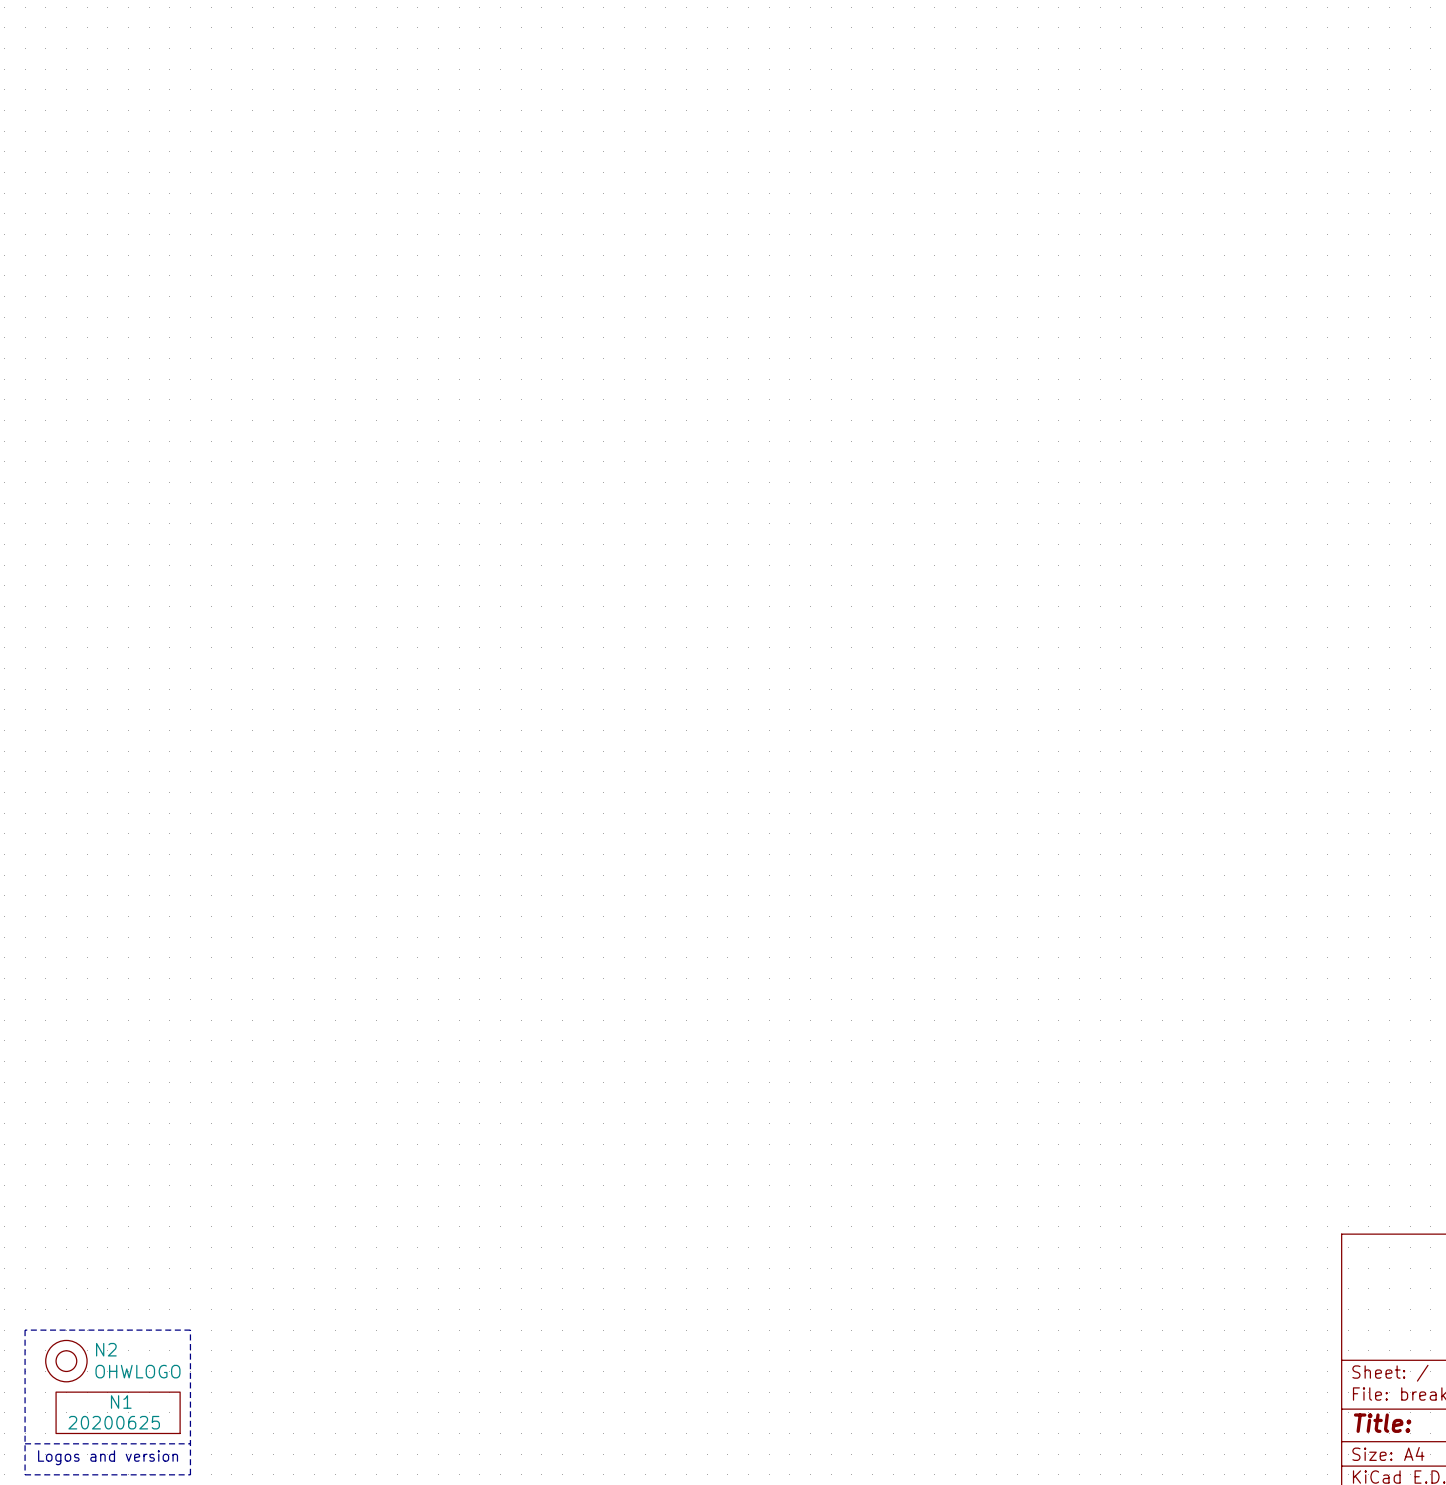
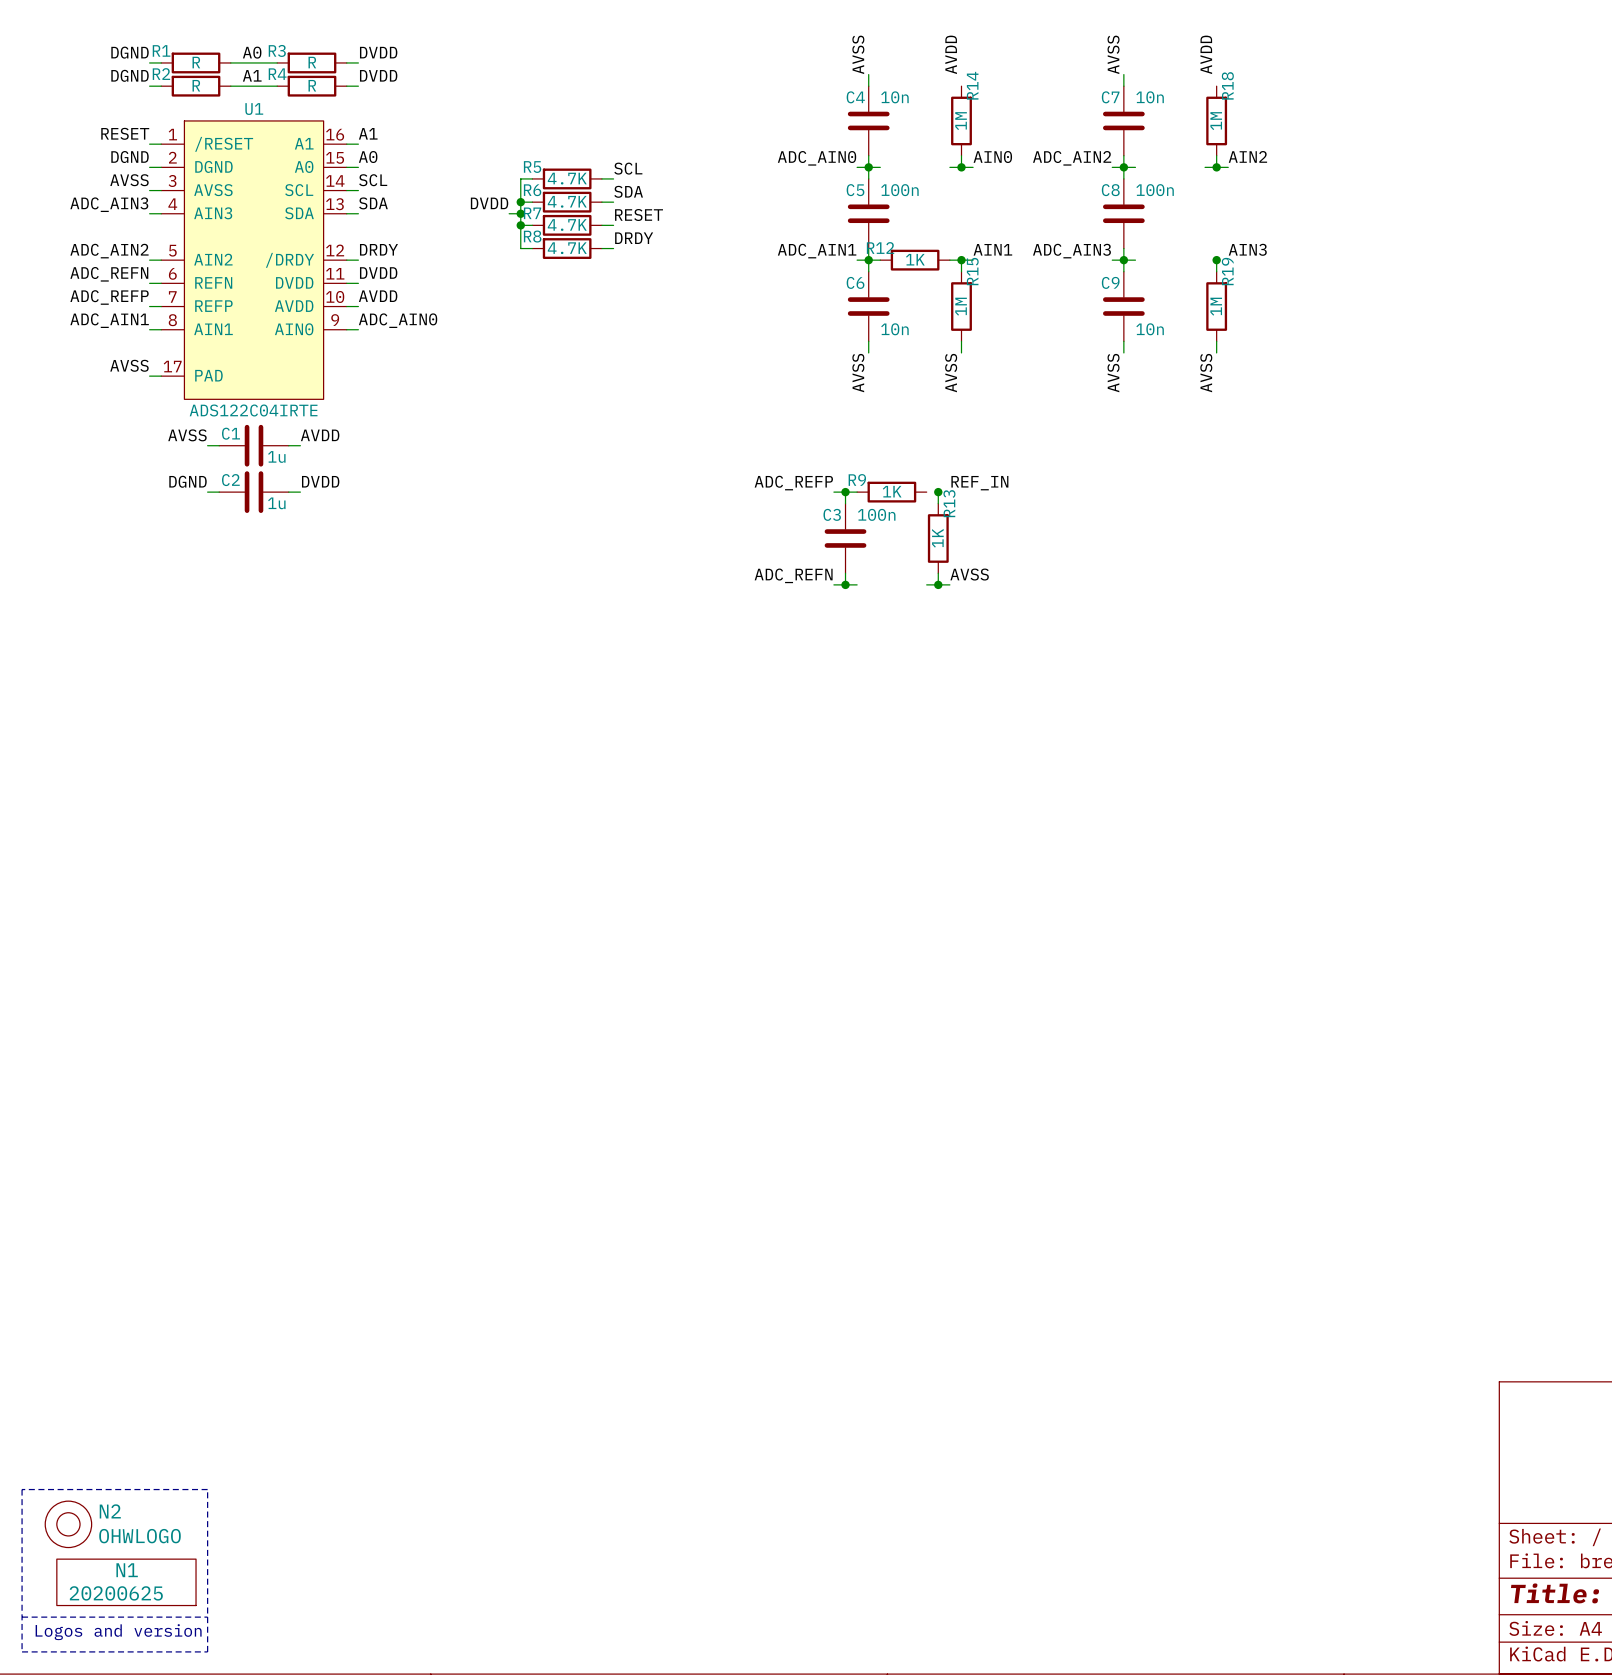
label: none -> DGND (130, 52)
label: none -> A0 (252, 52)
label: none -> DVDD (378, 52)
label: none -> AVDD (951, 54)
label: none -> AVDD (1206, 54)
label: none -> AVSS (858, 54)
label: none -> AVSS (1113, 54)
wire: none -> (149, 62) (161, 62)
R1: none -> R (196, 62)
wire: none -> (230, 62) (277, 62)
R3: none -> R (312, 62)
wire: none -> (346, 62) (358, 62)
wire: none -> (868, 74) (868, 86)
wire: none -> (1123, 74) (1123, 86)
label: none -> DGND (130, 75)
label: none -> A1 (252, 75)
label: none -> DVDD (378, 75)
wire: none -> (149, 86) (161, 86)
R2: none -> R (196, 86)
wire: none -> (230, 86) (277, 86)
R4: none -> R (312, 86)
wire: none -> (346, 86) (358, 86)
C4: none -> 10n (868, 120)
R14: none -> 1M (961, 120)
C7: none -> 10n (1123, 120)
R18: none -> 1M (1216, 120)
label: none -> RESET (125, 133)
label: none -> A1 (368, 133)
wire: none -> (149, 144) (161, 144)
wire: none -> (346, 144) (358, 144)
wire: none -> (868, 155) (868, 178)
wire: none -> (961, 155) (961, 167)
wire: none -> (1123, 155) (1123, 178)
wire: none -> (1216, 155) (1216, 167)
label: none -> DGND (130, 157)
label: none -> A0 (368, 157)
label: none -> AIN0 (992, 157)
label: none -> AIN2 (1247, 156)
label: none -> ADC_AIN0 (817, 158)
label: none -> ADC_AIN2 (1072, 158)
wire: none -> (149, 167) (161, 167)
wire: none -> (346, 167) (358, 167)
wire: none -> (857, 167) (880, 167)
junction: none -> (868, 167)
wire: none -> (949, 167) (973, 167)
junction: none -> (961, 167)
wire: none -> (1112, 167) (1135, 167)
junction: none -> (1123, 167)
wire: none -> (1205, 167) (1228, 167)
junction: none -> (1216, 167)
label: none -> SCL (628, 168)
wire: none -> (532, 178) (520, 178) (520, 248) (532, 248)
R5: none -> 4.7K (567, 178)
wire: none -> (601, 178) (613, 178)
label: none -> AVSS (129, 180)
label: none -> SCL (373, 180)
wire: none -> (149, 190) (161, 190)
wire: none -> (346, 190) (358, 190)
label: none -> SDA (628, 191)
wire: none -> (520, 202) (532, 202)
junction: none -> (520, 202)
R6: none -> 4.7K (567, 202)
wire: none -> (601, 202) (613, 202)
label: none -> SDA (373, 203)
label: none -> DVDD (489, 203)
label: none -> ADC_AIN3 (109, 204)
wire: none -> (149, 213) (161, 213)
wire: none -> (346, 213) (358, 213)
wire: none -> (509, 213) (520, 213)
junction: none -> (520, 213)
C5: none -> 100n (868, 213)
C8: none -> 100n (1123, 213)
label: none -> RESET (639, 215)
wire: none -> (520, 225) (532, 225)
junction: none -> (520, 225)
R7: none -> 4.7K (567, 225)
wire: none -> (601, 225) (613, 225)
label: none -> DRDY (634, 238)
R8: none -> 4.7K (567, 248)
wire: none -> (601, 248) (613, 248)
wire: none -> (868, 248) (868, 271)
wire: none -> (1123, 248) (1123, 271)
label: none -> ADC_AIN2 (109, 251)
label: none -> DRDY (378, 249)
label: none -> ADC_AIN1 (817, 251)
label: none -> AIN1 (992, 249)
label: none -> ADC_AIN3 (1071, 251)
label: none -> AIN3 (1247, 249)
wire: none -> (149, 260) (161, 260)
U1: none -> ADS122C04IRTE (254, 260)
wire: none -> (346, 260) (358, 260)
wire: none -> (857, 260) (880, 260)
junction: none -> (868, 260)
R12: none -> 1K (915, 260)
wire: none -> (949, 260) (973, 260)
wire: none -> (961, 260) (961, 271)
junction: none -> (961, 260)
wire: none -> (1112, 260) (1135, 260)
junction: none -> (1123, 260)
wire: none -> (1216, 260) (1216, 271)
junction: none -> (1216, 260)
label: none -> DVDD (378, 272)
label: none -> ADC_REFN (109, 274)
wire: none -> (149, 283) (161, 283)
wire: none -> (346, 283) (358, 283)
label: none -> AVDD (378, 296)
label: none -> ADC_REFP (109, 297)
wire: none -> (149, 306) (161, 306)
wire: none -> (346, 306) (358, 306)
C6: none -> 10n (868, 306)
R15: none -> 1M (961, 306)
C9: none -> 10n (1123, 306)
R19: none -> 1M (1216, 306)
label: none -> ADC_AIN1 (109, 320)
label: none -> ADC_AIN0 (398, 320)
wire: none -> (149, 329) (161, 329)
wire: none -> (346, 329) (358, 329)
wire: none -> (868, 341) (868, 352)
wire: none -> (961, 341) (961, 352)
wire: none -> (1123, 341) (1123, 352)
wire: none -> (1216, 341) (1216, 352)
label: none -> AVSS (129, 365)
wire: none -> (149, 376) (161, 376)
label: none -> AVSS (858, 373)
label: none -> AVSS (951, 373)
label: none -> AVSS (1113, 373)
label: none -> AVSS (1206, 373)
label: none -> AVSS (187, 435)
label: none -> AVDD (320, 435)
wire: none -> (207, 445) (219, 445)
C1: none -> 1u (254, 445)
wire: none -> (288, 445) (300, 445)
label: none -> DGND (188, 481)
label: none -> DVDD (320, 481)
label: none -> ADC_REFP (793, 483)
label: none -> REF_IN (979, 483)
wire: none -> (207, 492) (219, 492)
C2: none -> 1u (254, 492)
wire: none -> (288, 492) (300, 492)
wire: none -> (833, 492) (857, 492)
wire: none -> (845, 492) (845, 503)
junction: none -> (845, 492)
R9: none -> 1K (891, 492)
wire: none -> (938, 492) (938, 503)
junction: none -> (938, 492)
C3: none -> 100n (845, 538)
R13: none -> 1K (938, 538)
wire: none -> (845, 573) (845, 584)
wire: none -> (938, 573) (938, 584)
label: none -> AVSS (969, 574)
label: none -> ADC_REFN (793, 575)
wire: none -> (833, 584) (857, 584)
junction: none -> (845, 584)
wire: none -> (926, 584) (949, 584)
junction: none -> (938, 584)

